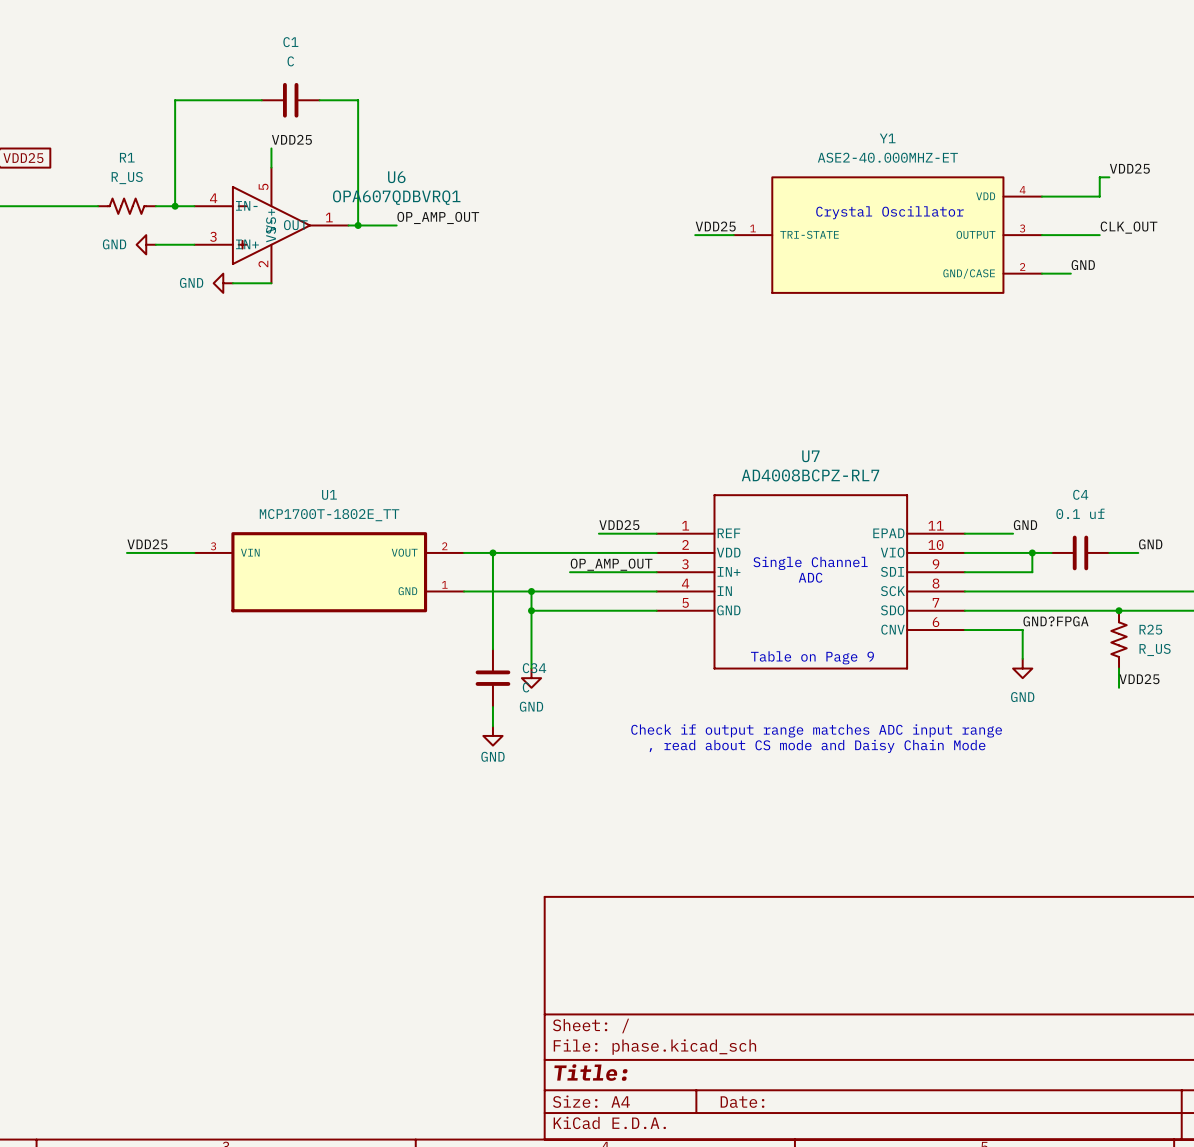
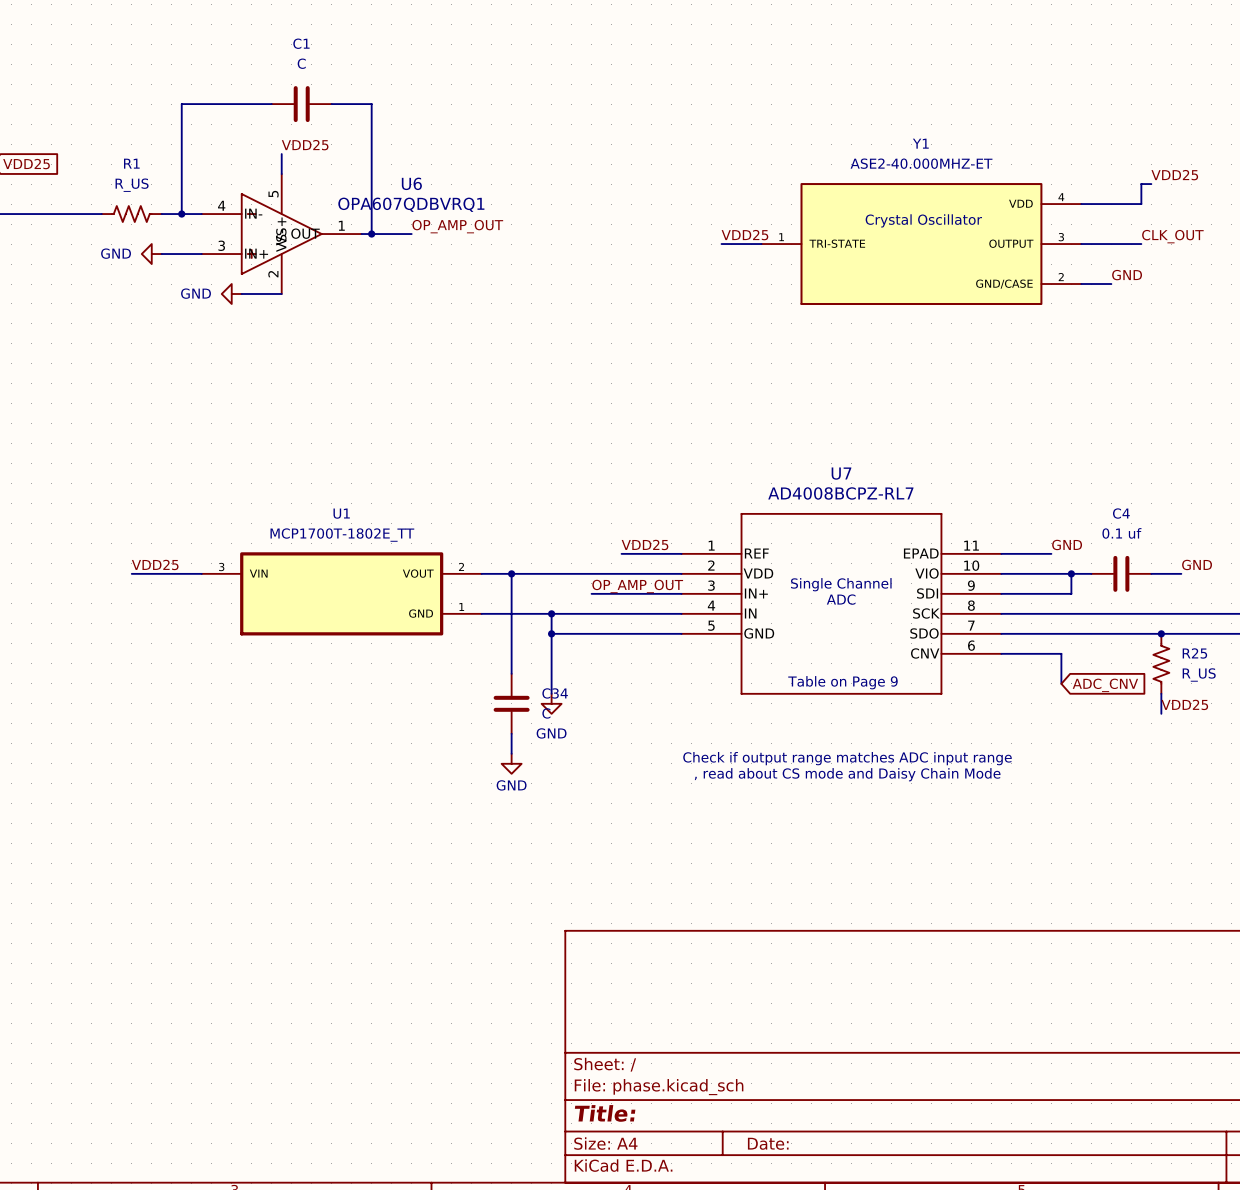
label: GND?FPGA (1055, 621) -> none
global label: none -> ADC_CNV (1105, 685)
power symbol: GND (1022, 668) -> none

